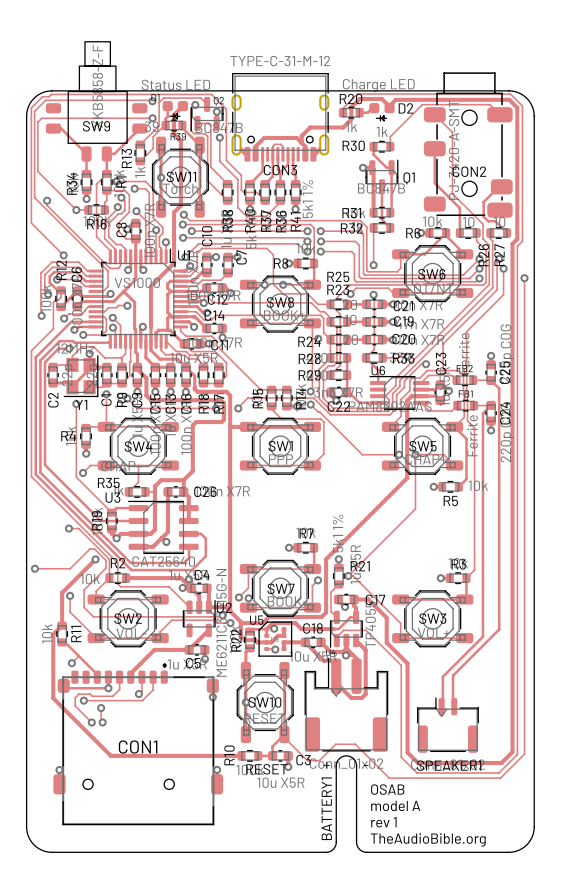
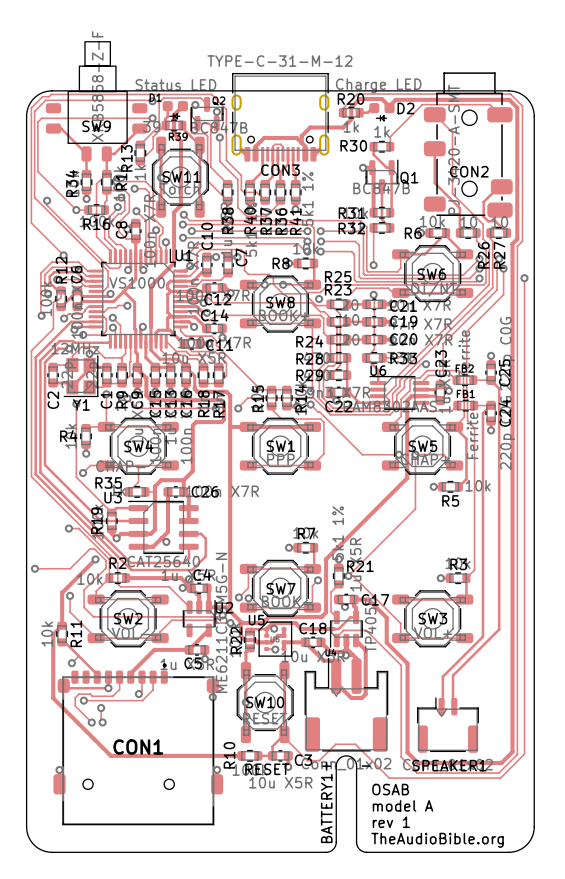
track: (200, 249) (266, 248) (273, 255) (273, 278) -> (200, 249) (241, 249) (244, 252) (244, 270) (248, 274) (269, 274) (273, 278)
track: (349, 285) (330, 304) (318, 304) (307, 293) -> (349, 285) (327, 285) (320, 292) (307, 293) (307, 296) (316, 305) (330, 304)
via: (350, 293) -> none
via: none -> (319, 299)
via: (318, 338) -> none

